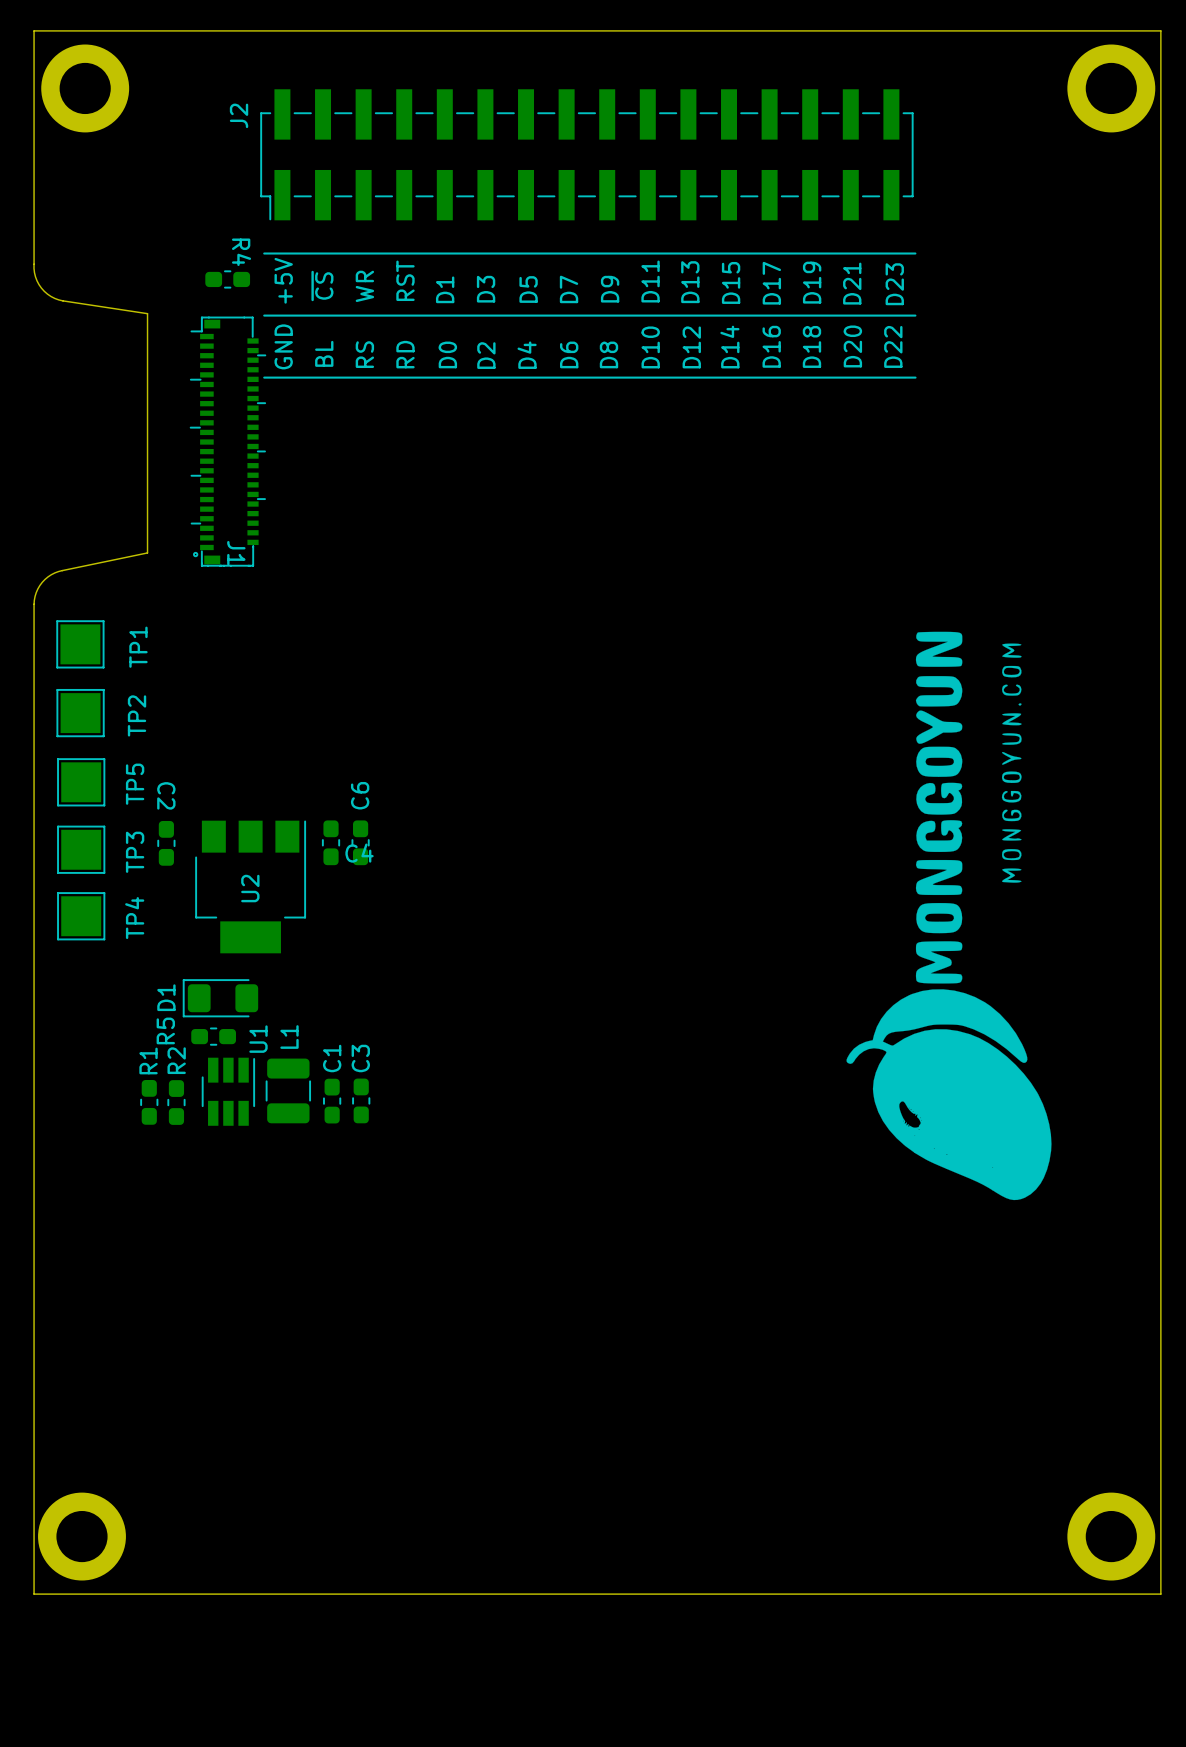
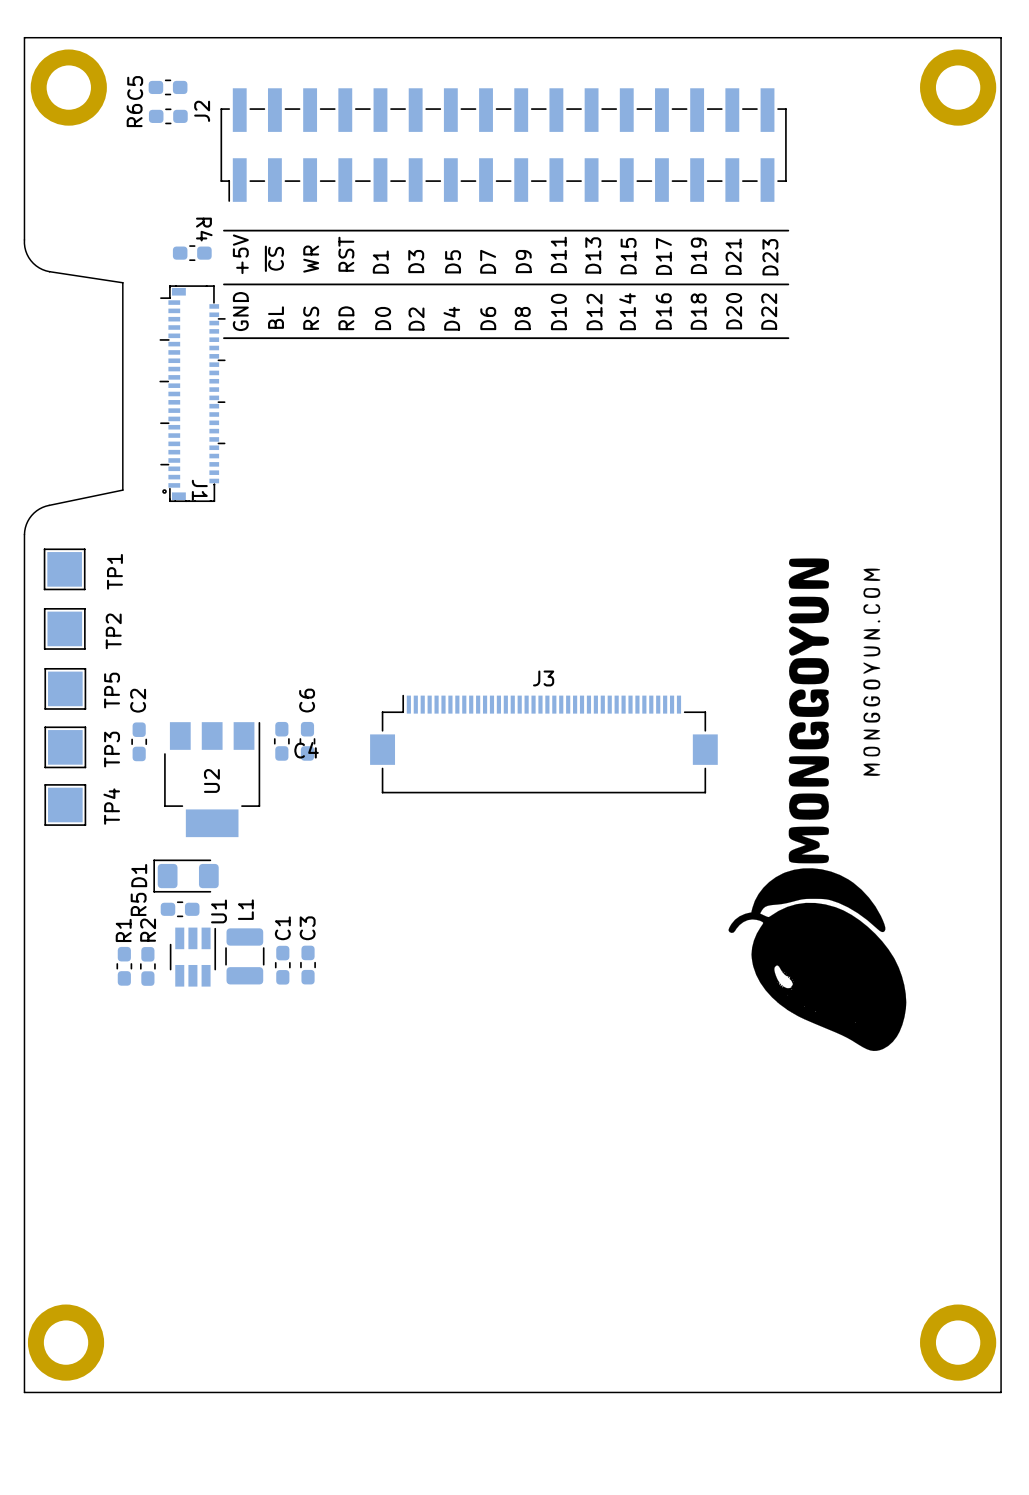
C5: none -> (168, 87)
R6: none -> (168, 116)
C2 name rotation: 0° (166, 795) -> 180° (138, 700)
J3: none -> (543, 744)

